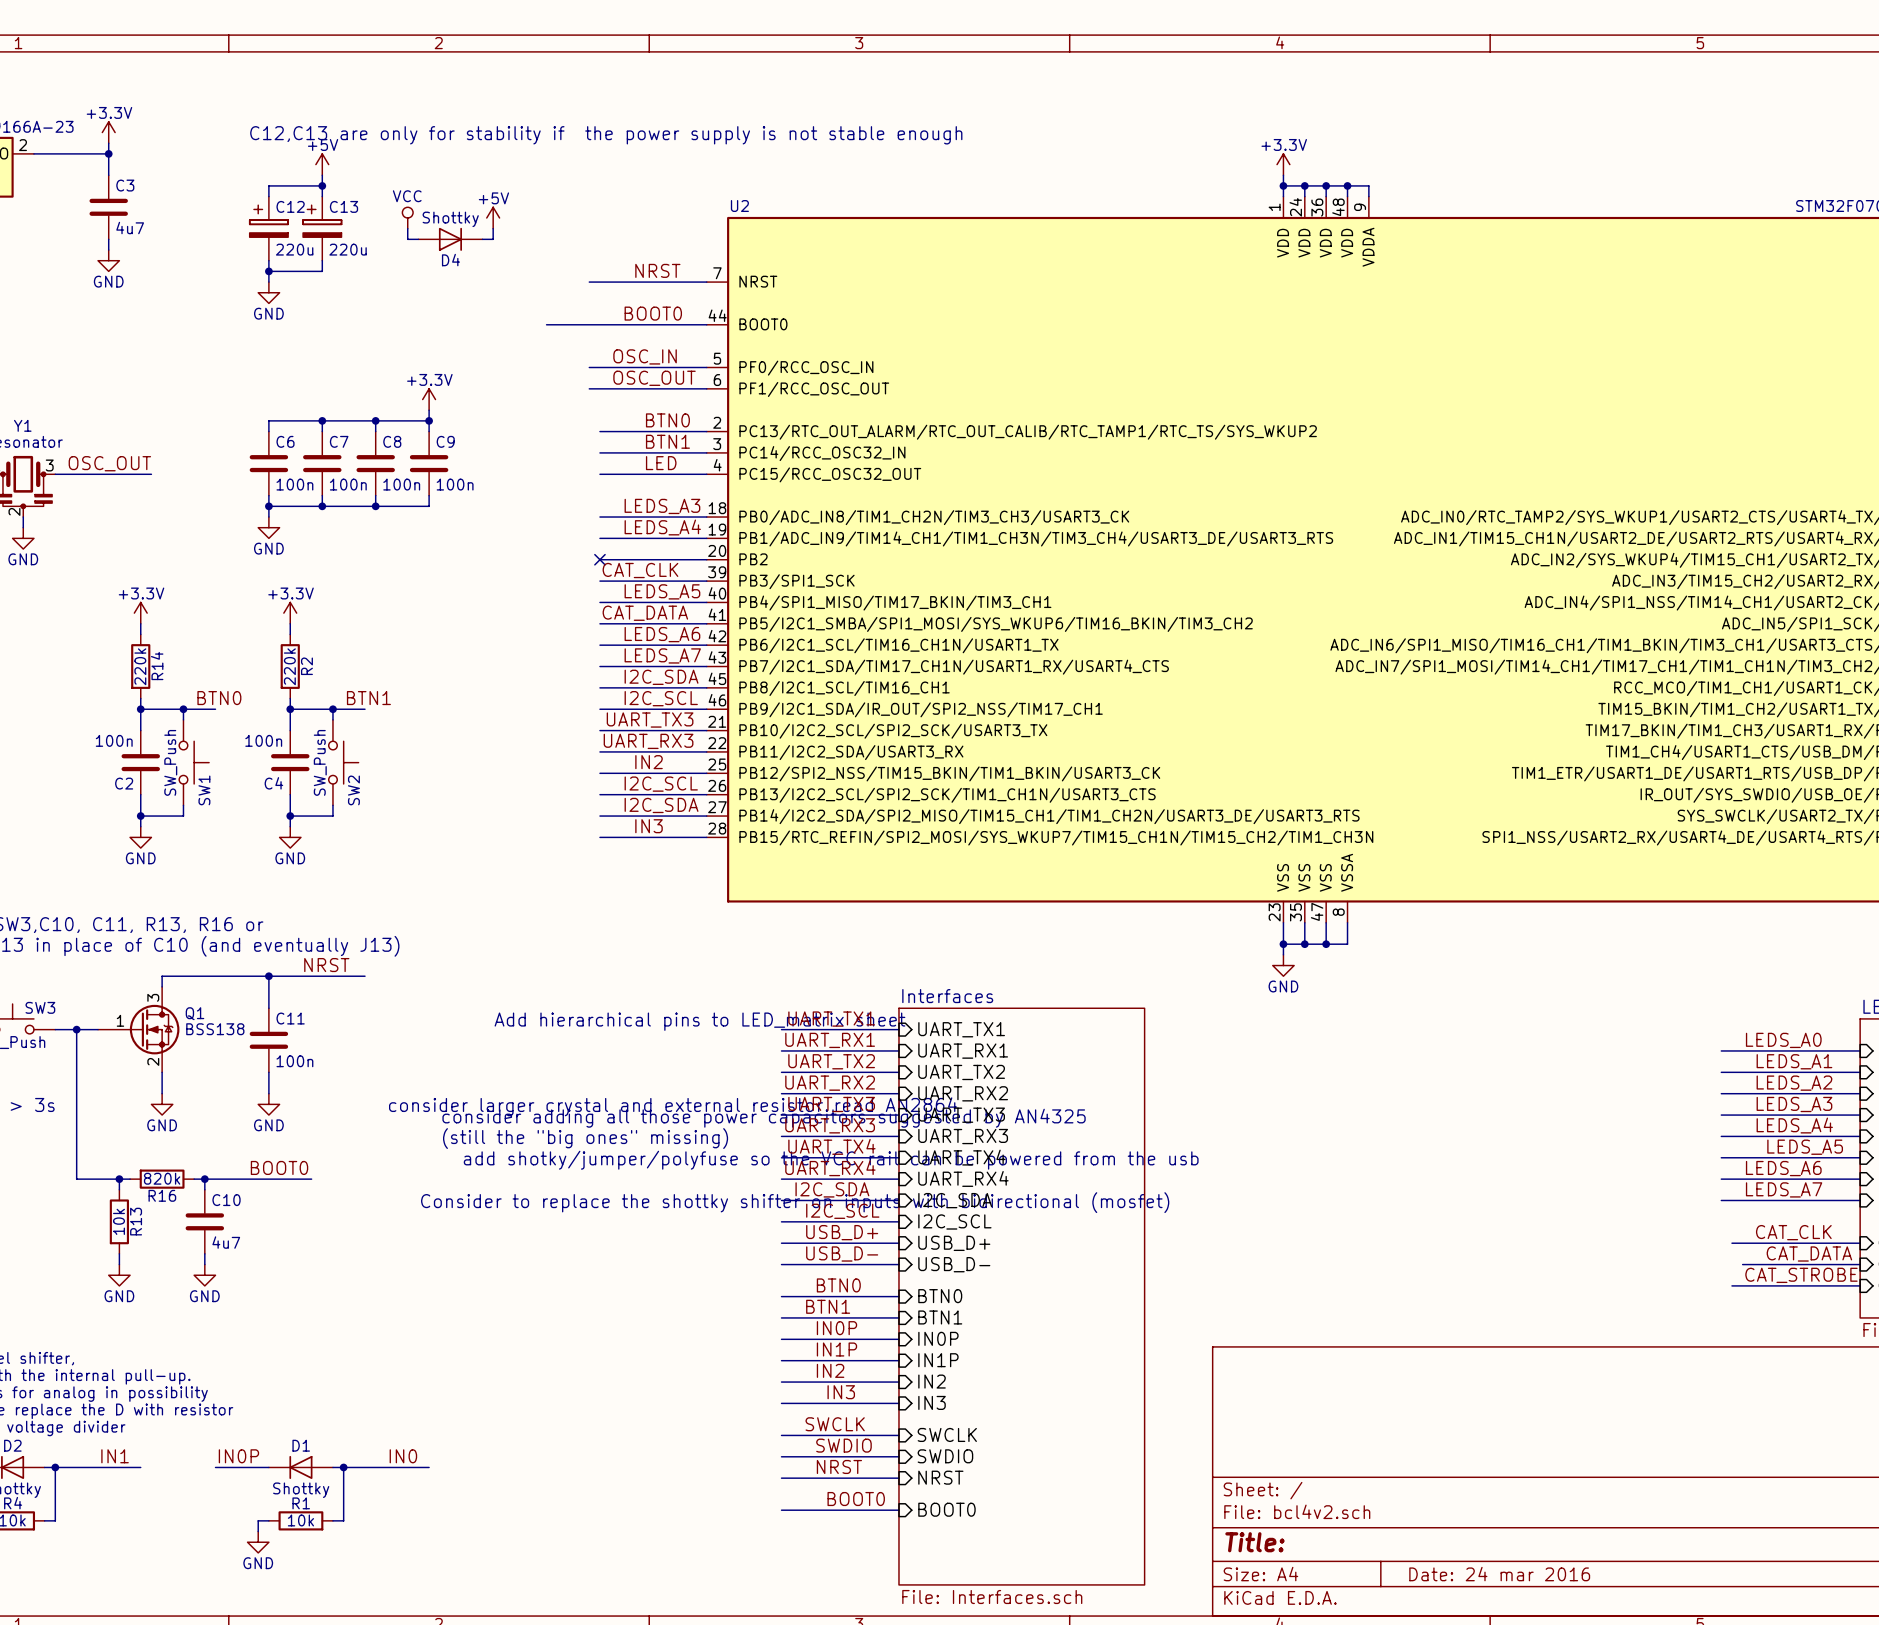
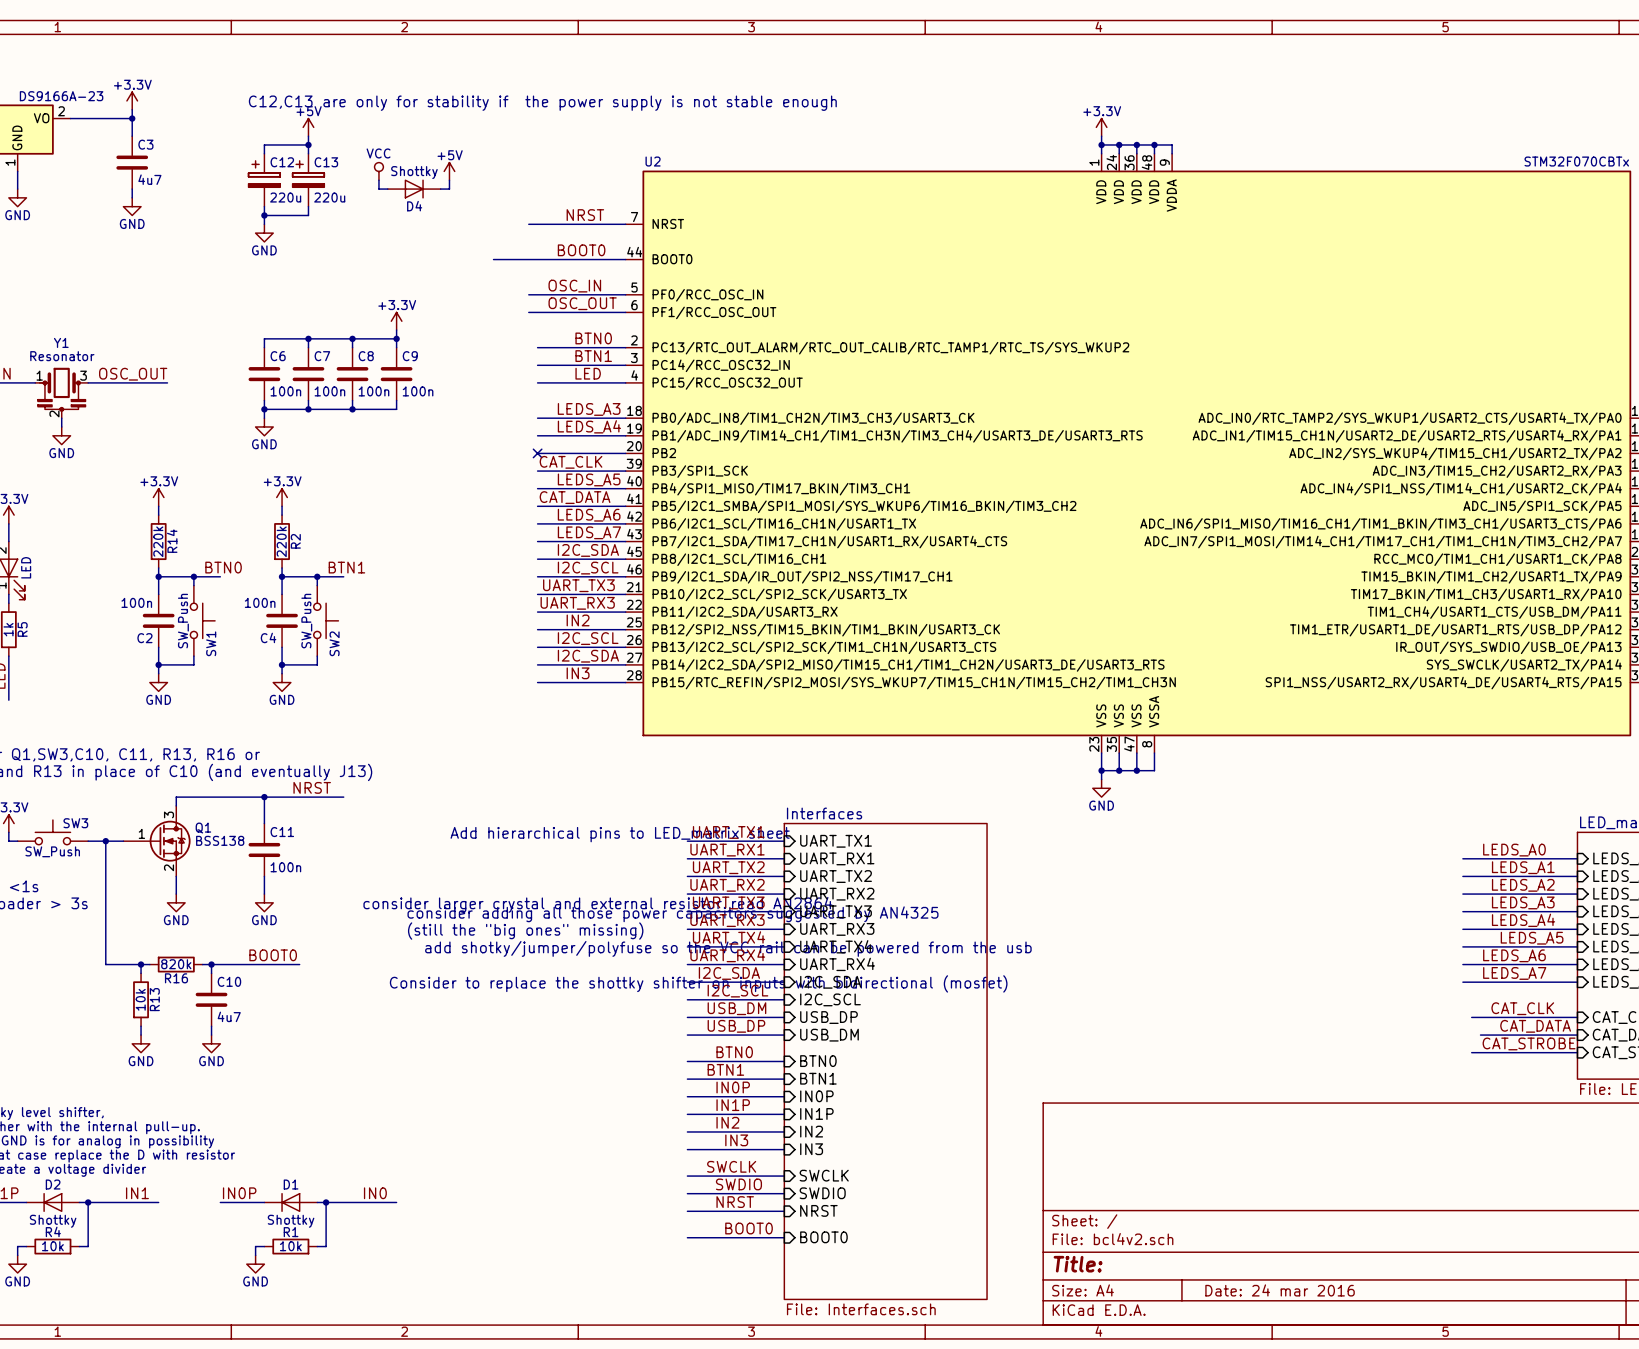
label: USB_D+ (842, 1232) -> USB_DM (736, 1008)
sheet pin: USB_D+ (954, 1243) -> USB_DP (828, 1017)
label: USB_D- (842, 1253) -> USB_DP (736, 1026)
sheet pin: USB_D- (954, 1264) -> USB_DM (829, 1035)

